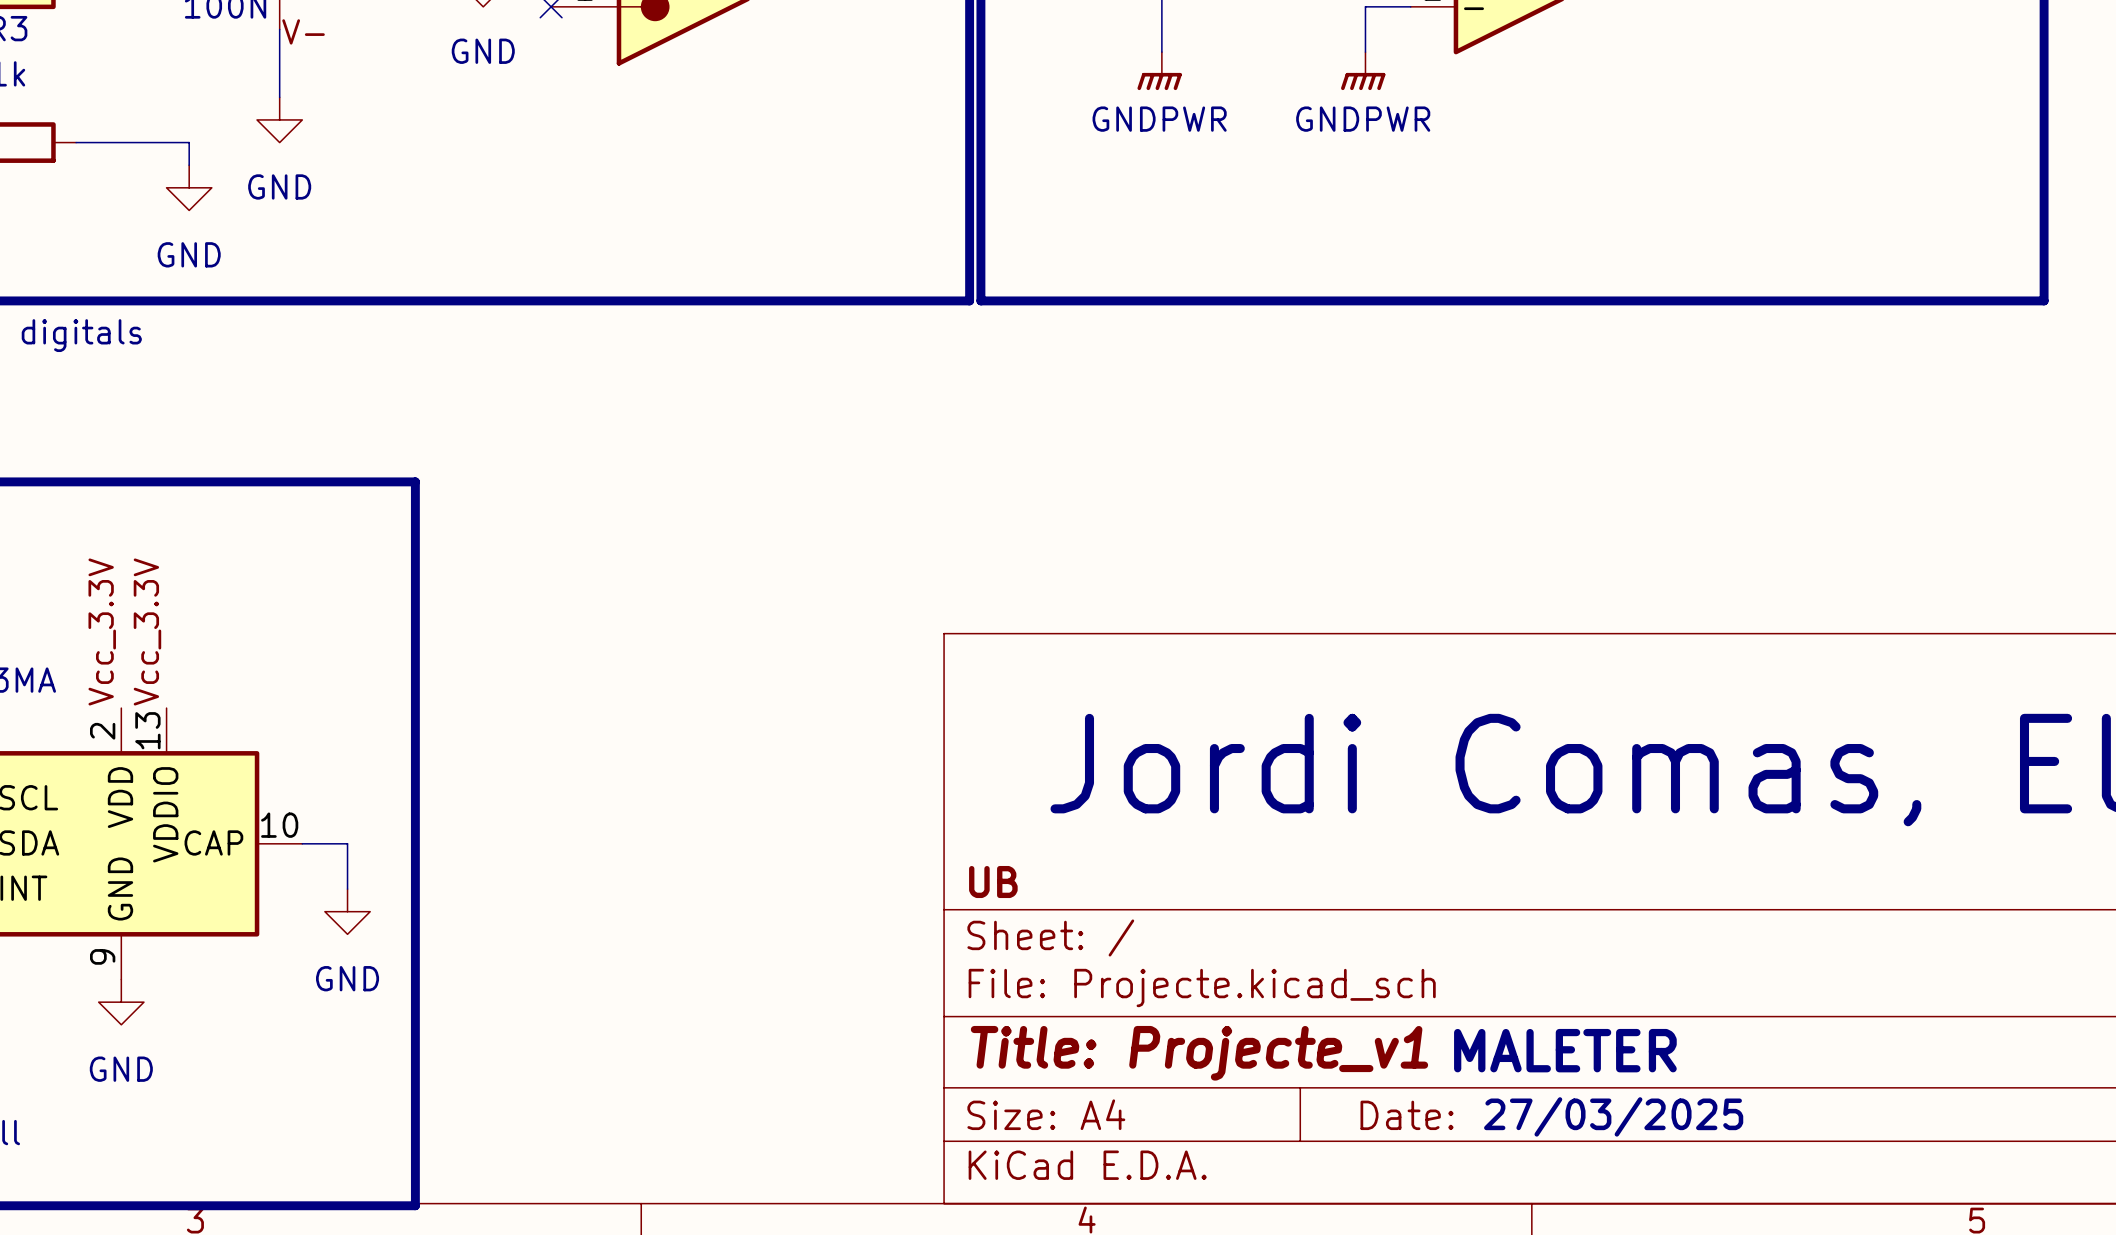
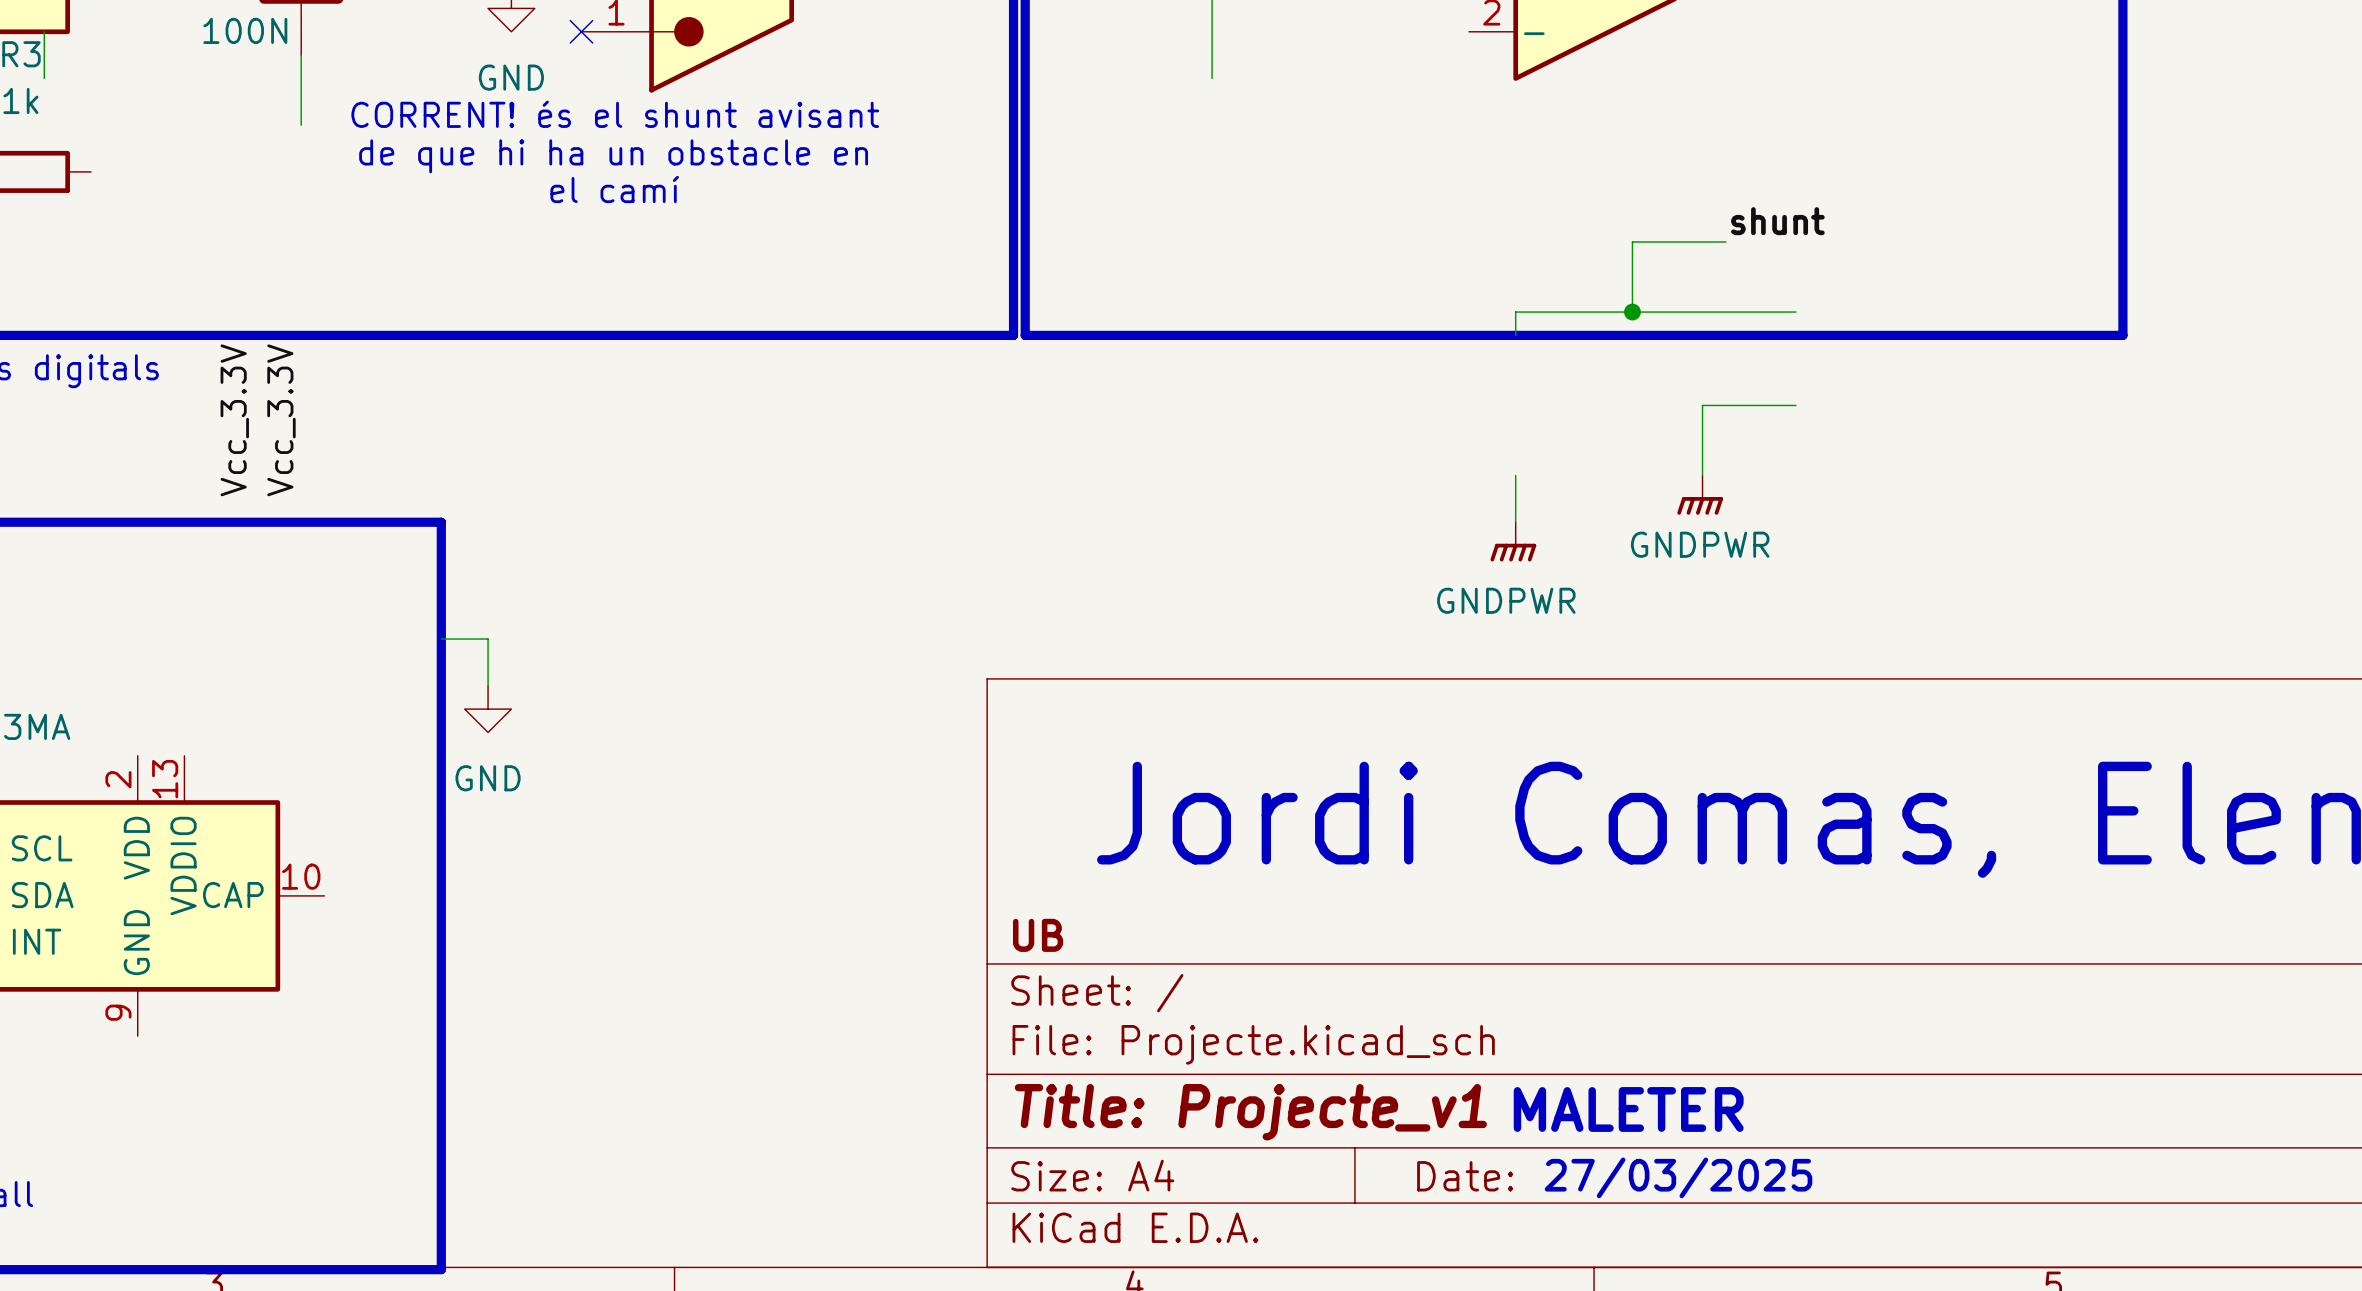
wire: none -> (44, 31) (44, 78)
wire: (1410, 6) (1365, 6) (1365, 52) -> none
label: V- (303, 31) -> none
power symbol: GNDPWR (1159, 71) -> none
power symbol: GNDPWR (1363, 71) -> none
text: none -> CORRENT! és el shunt avisant (615, 114)
power symbol: GND (279, 119) -> none
text: none -> de que hi ha un obstacle en (613, 156)
wire: (76, 142) (189, 142) (189, 165) -> none
text: none -> el camí (614, 189)
power symbol: GND (189, 187) -> none
label: none -> shunt (1777, 221)
wire: none -> (1725, 241) (1632, 241) (1632, 312)
junction: none -> (1632, 312)
wire: none -> (1795, 312) (1515, 312) (1515, 335)
wire: none -> (1795, 405) (1702, 405) (1702, 475)
label: none -> Vcc_3.3V (234, 420)
label: none -> Vcc_3.3V (281, 420)
wire: none -> (1515, 475) (1515, 522)
power symbol: none -> GNDPWR (1700, 495)
power symbol: none -> GNDPWR (1513, 541)
label: Vcc_3.3V (102, 631) -> none
label: Vcc_3.3V (147, 631) -> none
power symbol: none -> GND (488, 709)
wire: (302, 843) (347, 843) (347, 889) -> (441, 639) (488, 639) (488, 685)
power symbol: GND (347, 911) -> none
power symbol: GND (121, 1002) -> none

